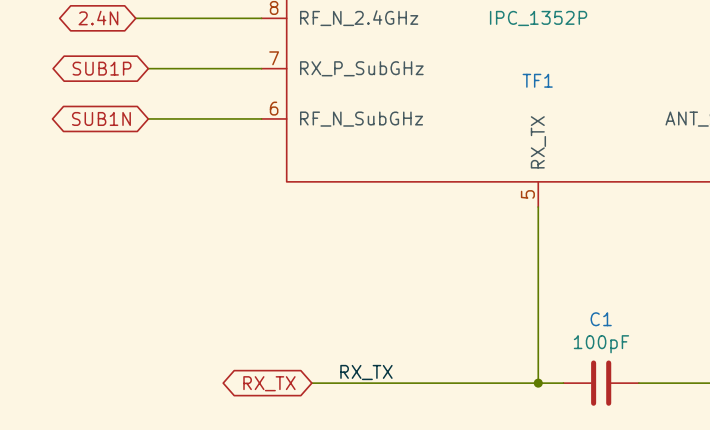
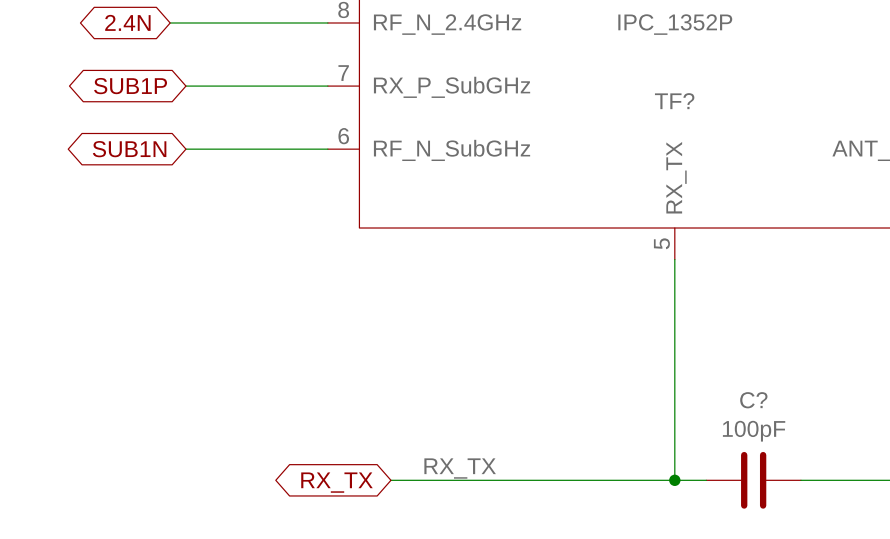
TF1 name: TF1 (537, 80) -> TF? (674, 101)
C1 name: C1 (601, 319) -> C? (753, 400)

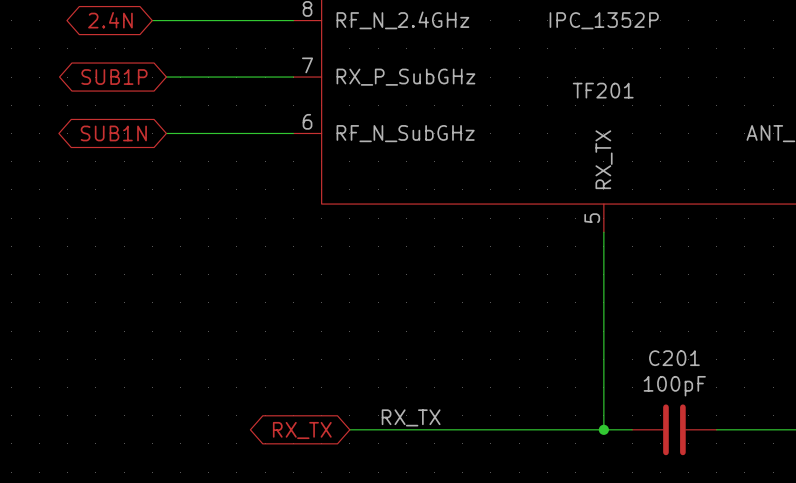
TF? name: TF? (674, 101) -> TF201 (603, 90)
C? name: C? (753, 400) -> C201 (674, 358)

